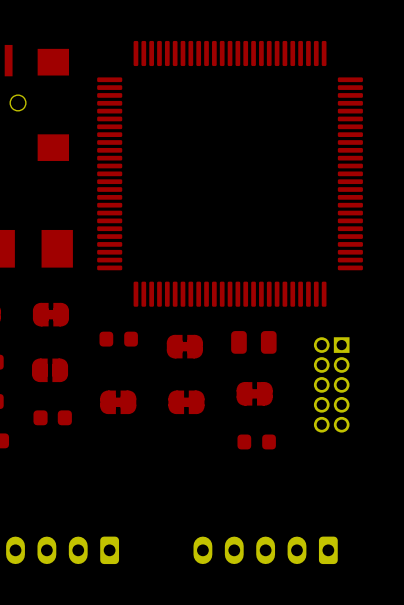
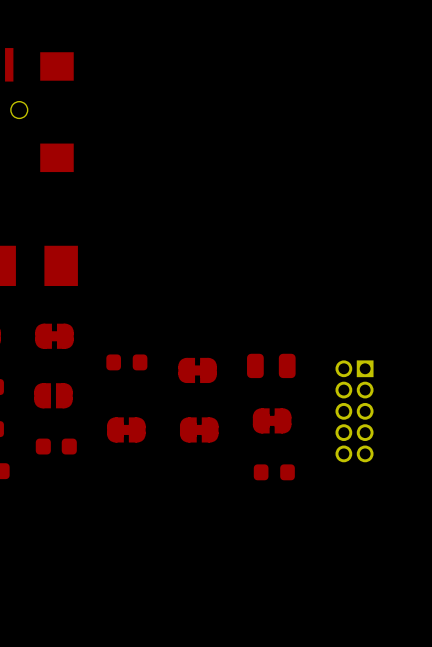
part: (230, 173) -> none
part: (62, 550) -> none
part: (265, 550) -> none

